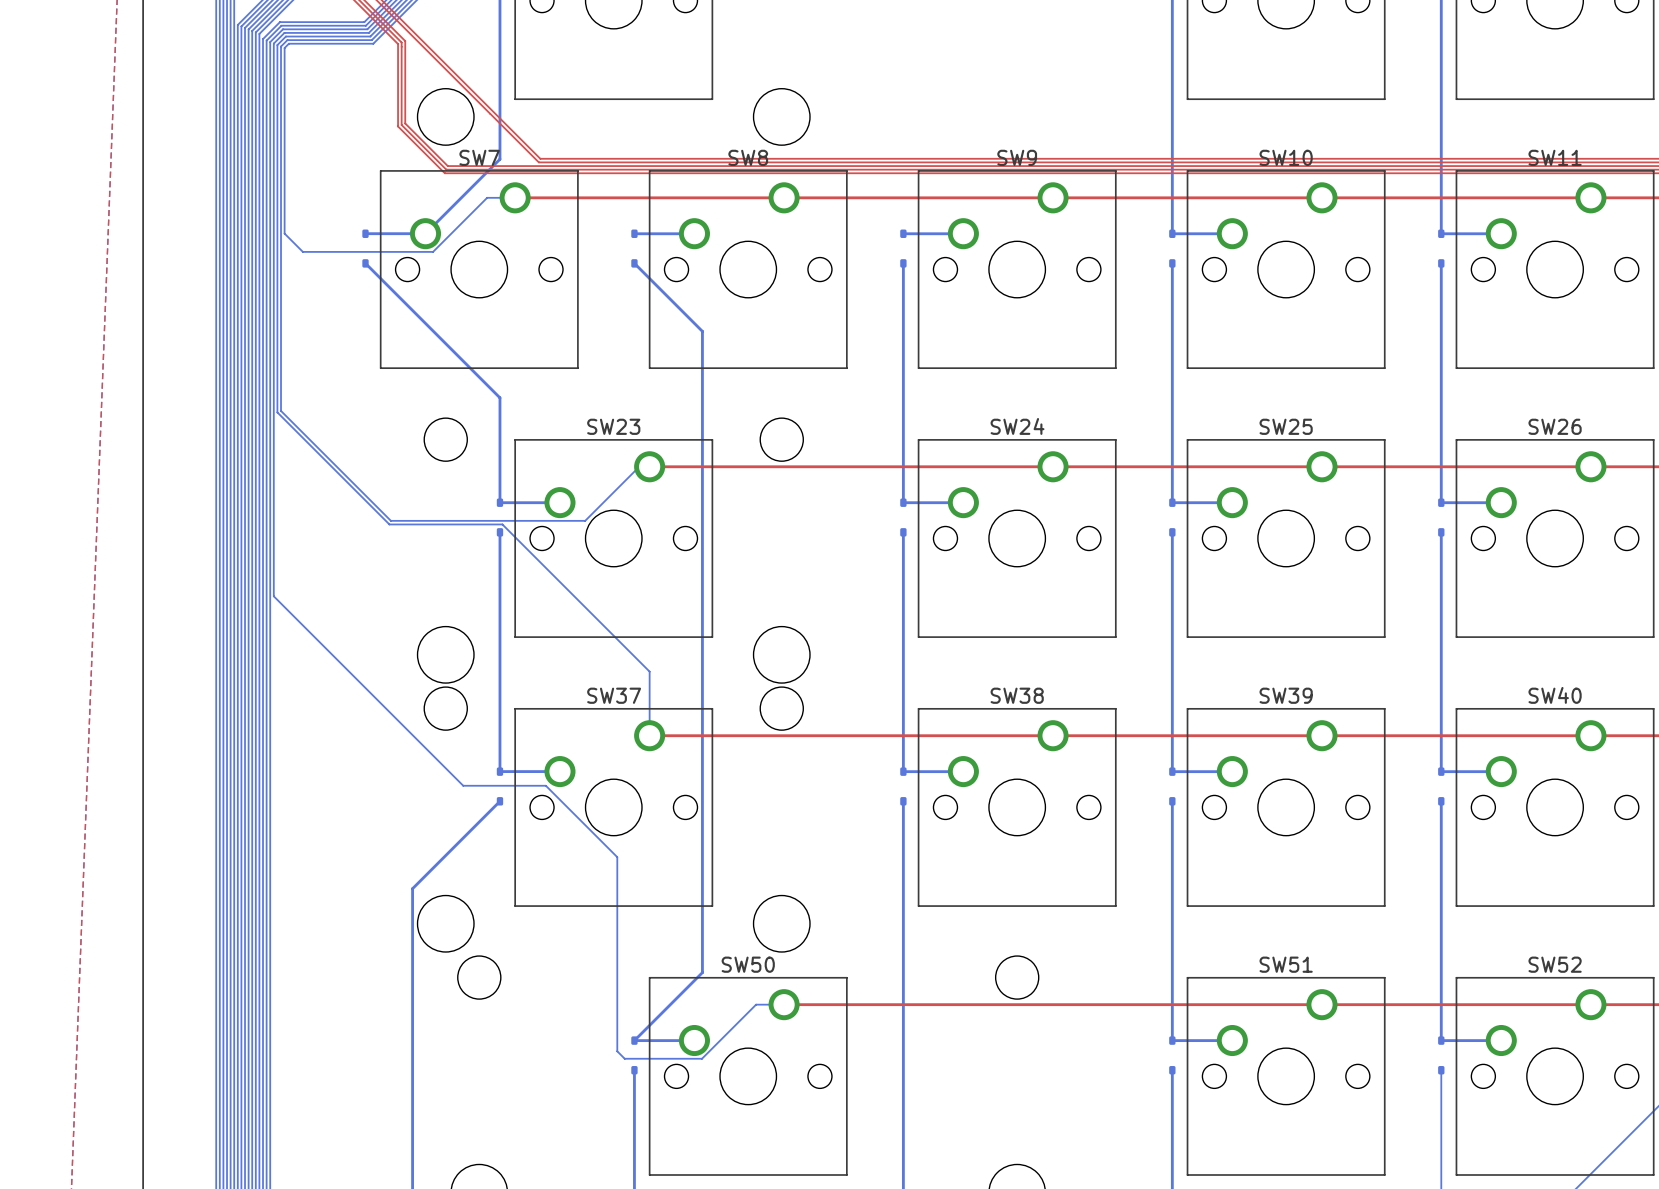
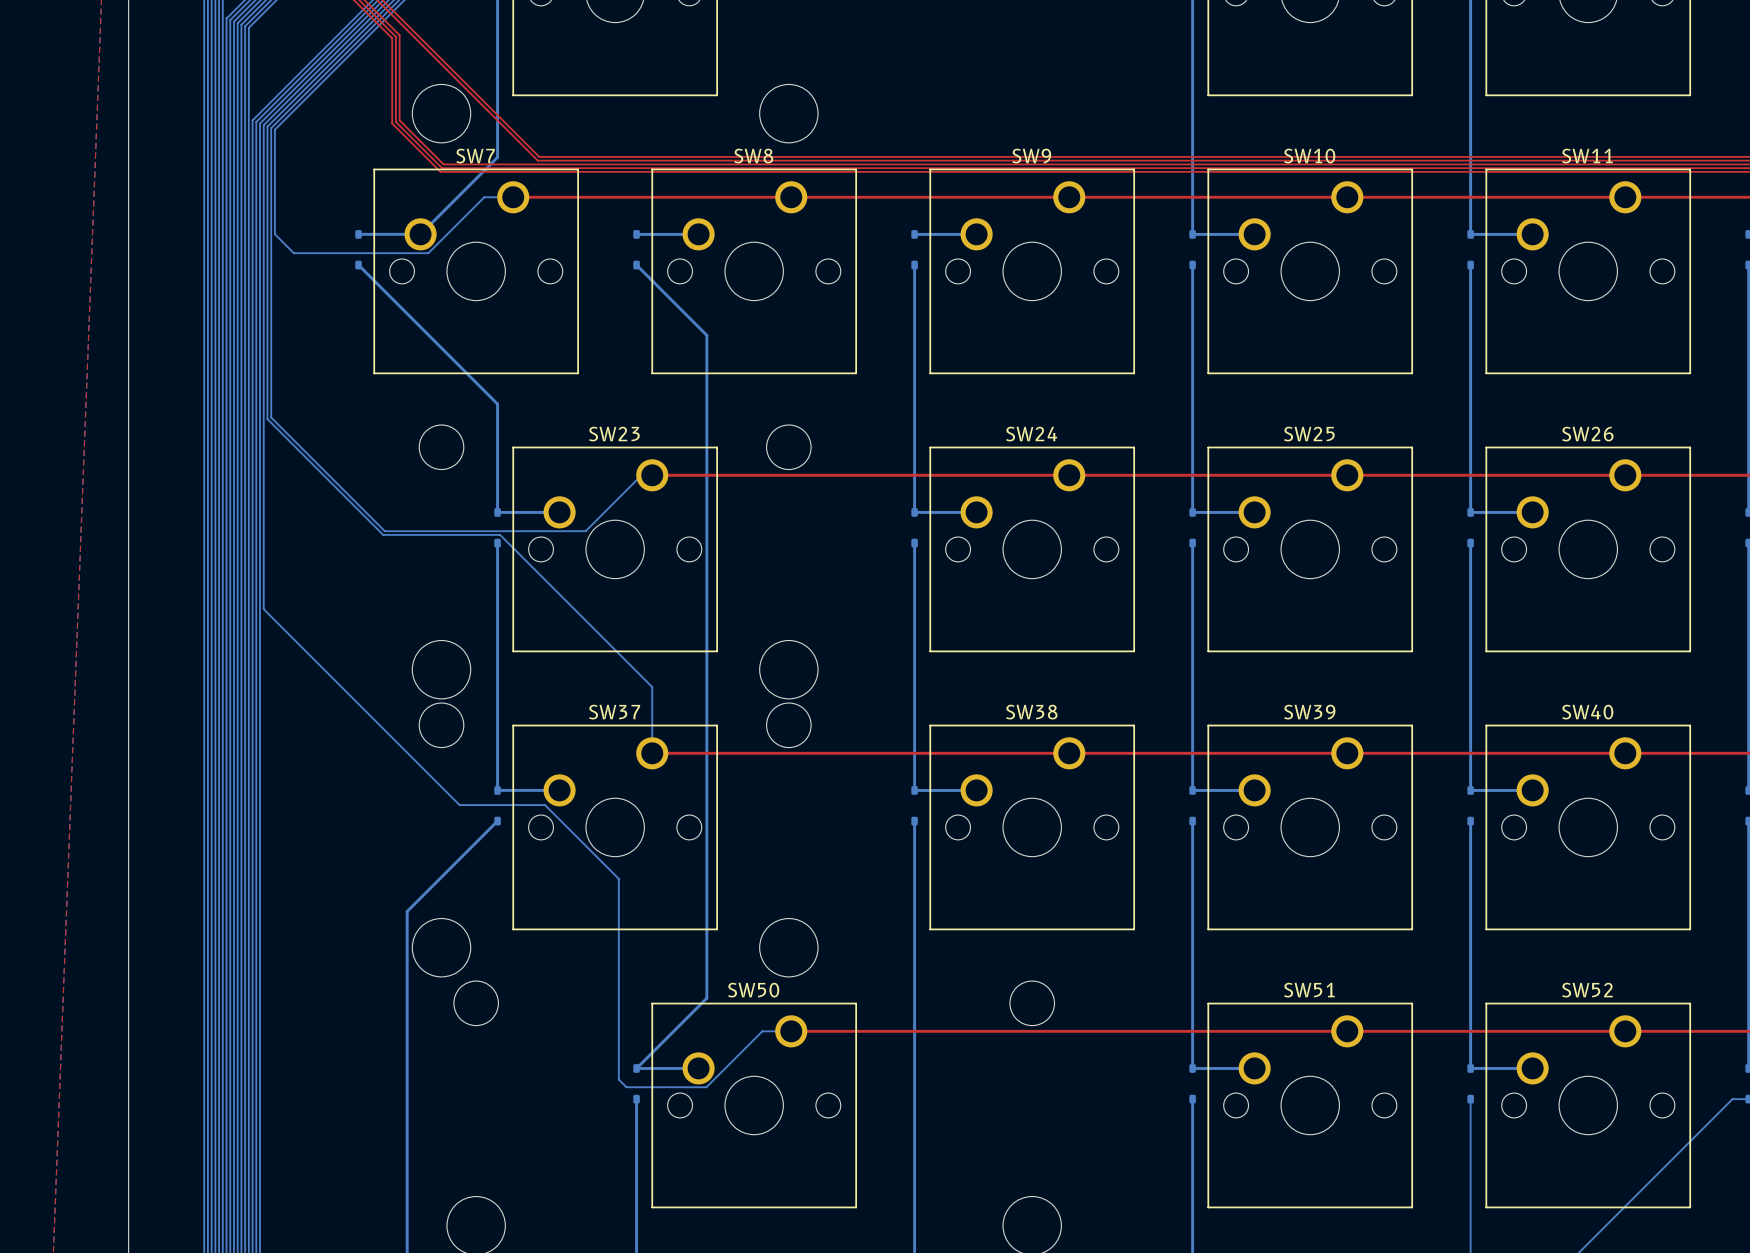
bottom track: (364, 22) (279, 22) (263, 39) (263, 123) -> (357, 15) (252, 120)
bottom track: (365, 25) (281, 25) (266, 40) (266, 125) -> (358, 19) (256, 121)
bottom track: (367, 29) (282, 29) (270, 42) (270, 126) -> (360, 23) (260, 123)
bottom track: (368, 32) (284, 32) (273, 43) (273, 127) -> (362, 26) (263, 125)
bottom track: (370, 36) (285, 36) (277, 45) (277, 129) -> (363, 30) (267, 126)
bottom track: (371, 40) (287, 40) (281, 46) (281, 130) -> (365, 34) (271, 128)
bottom track: (373, 43) (288, 43) (284, 48) (284, 132) -> (366, 37) (274, 129)

